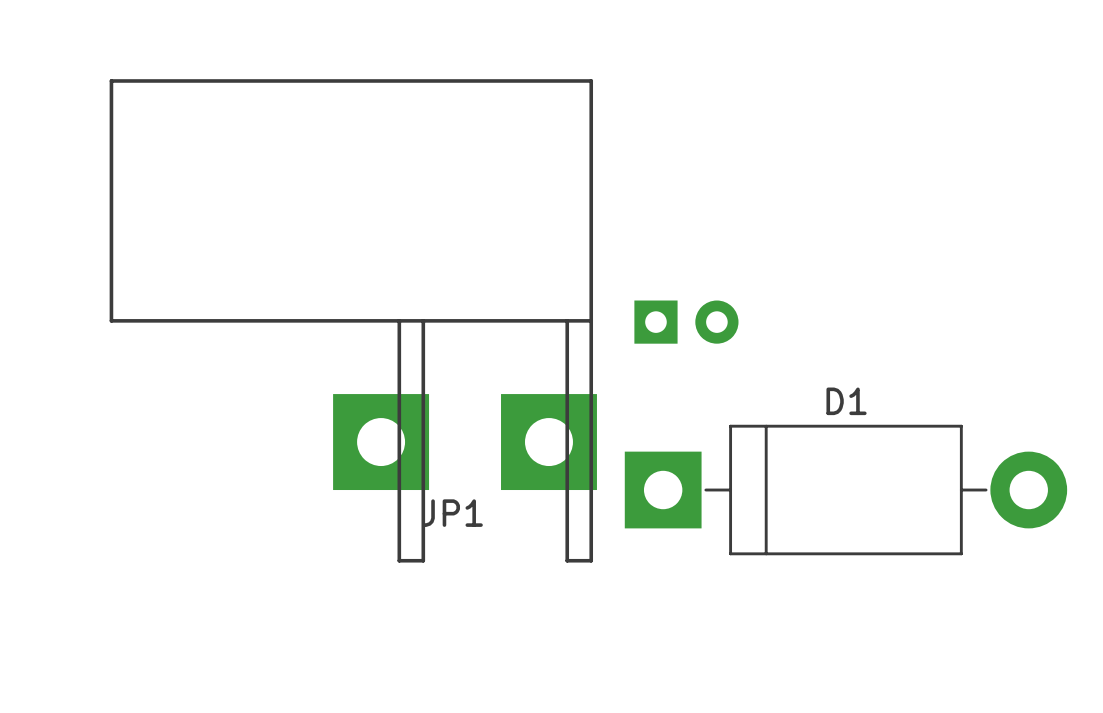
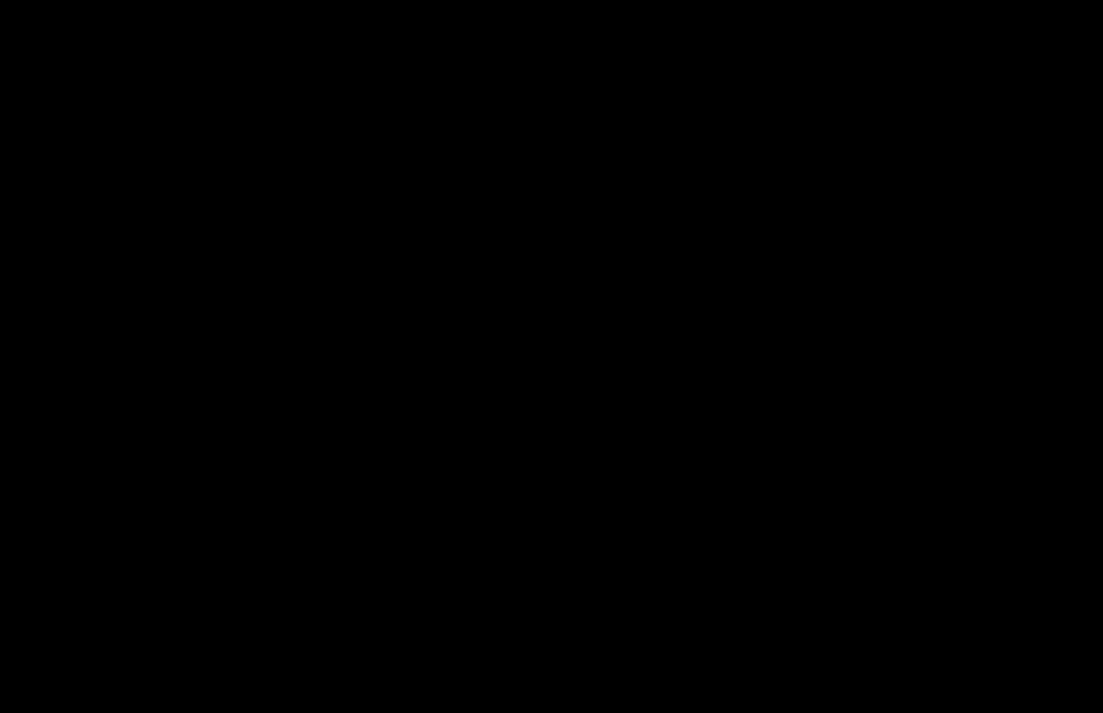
part: (686, 322) -> none
JP1: (344, 357) -> none
D1: (845, 490) -> none

